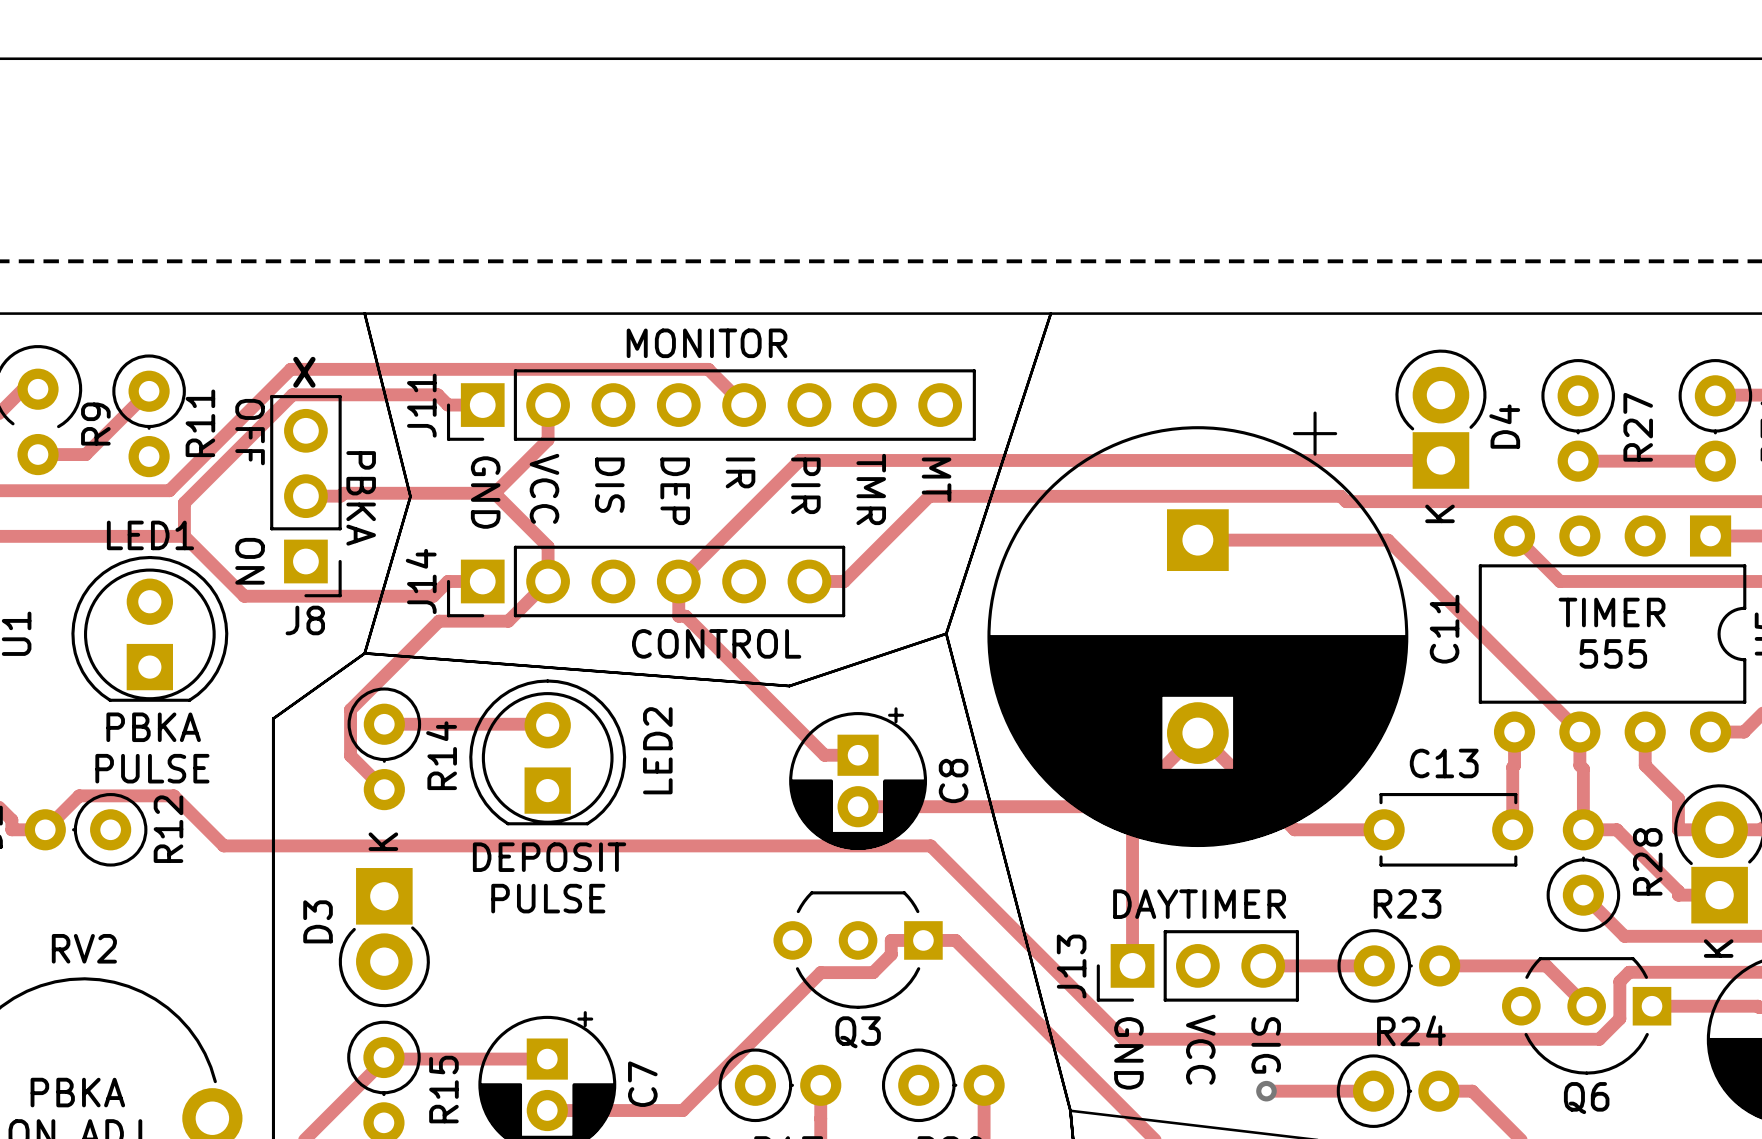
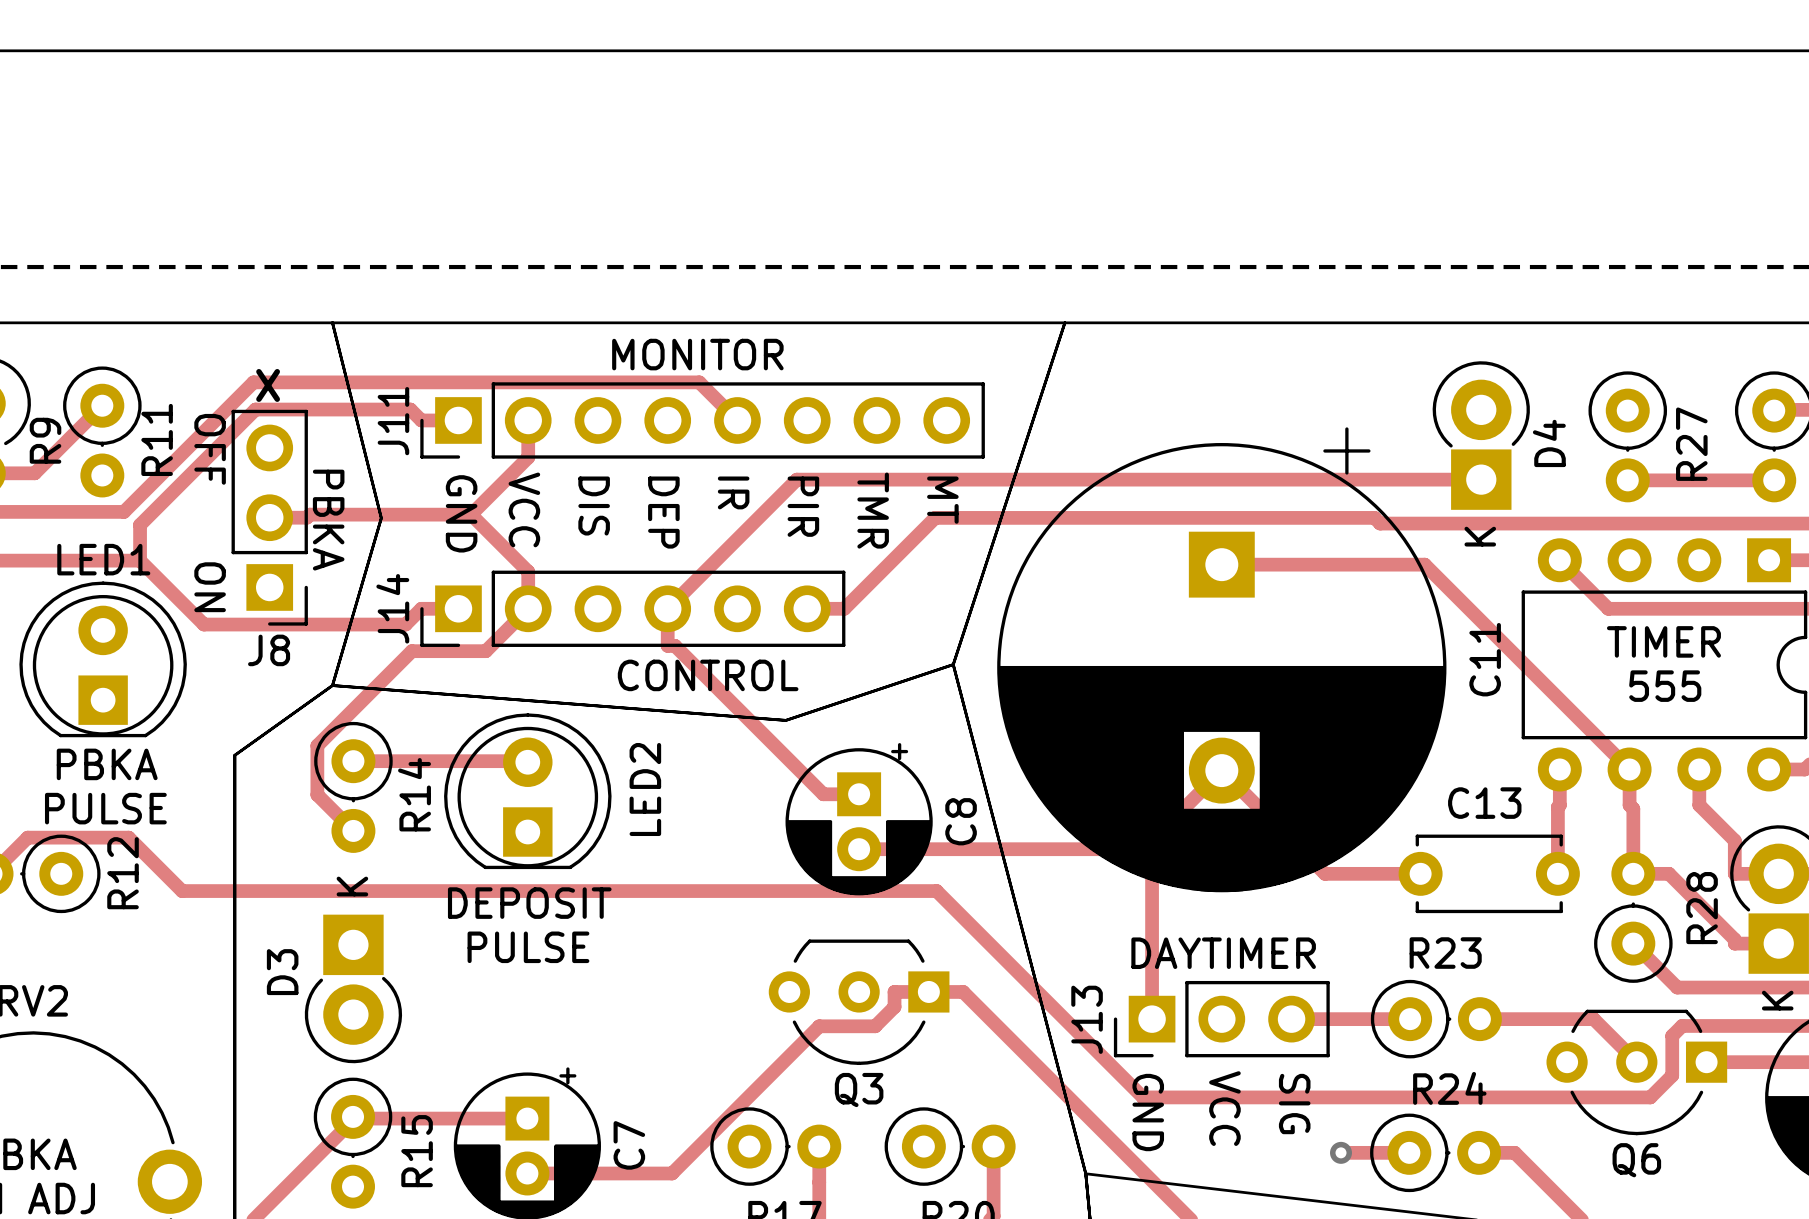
track: (1266, 1091) (1309, 1091) -> none
via position: (1266, 1091) -> (1341, 1152)

